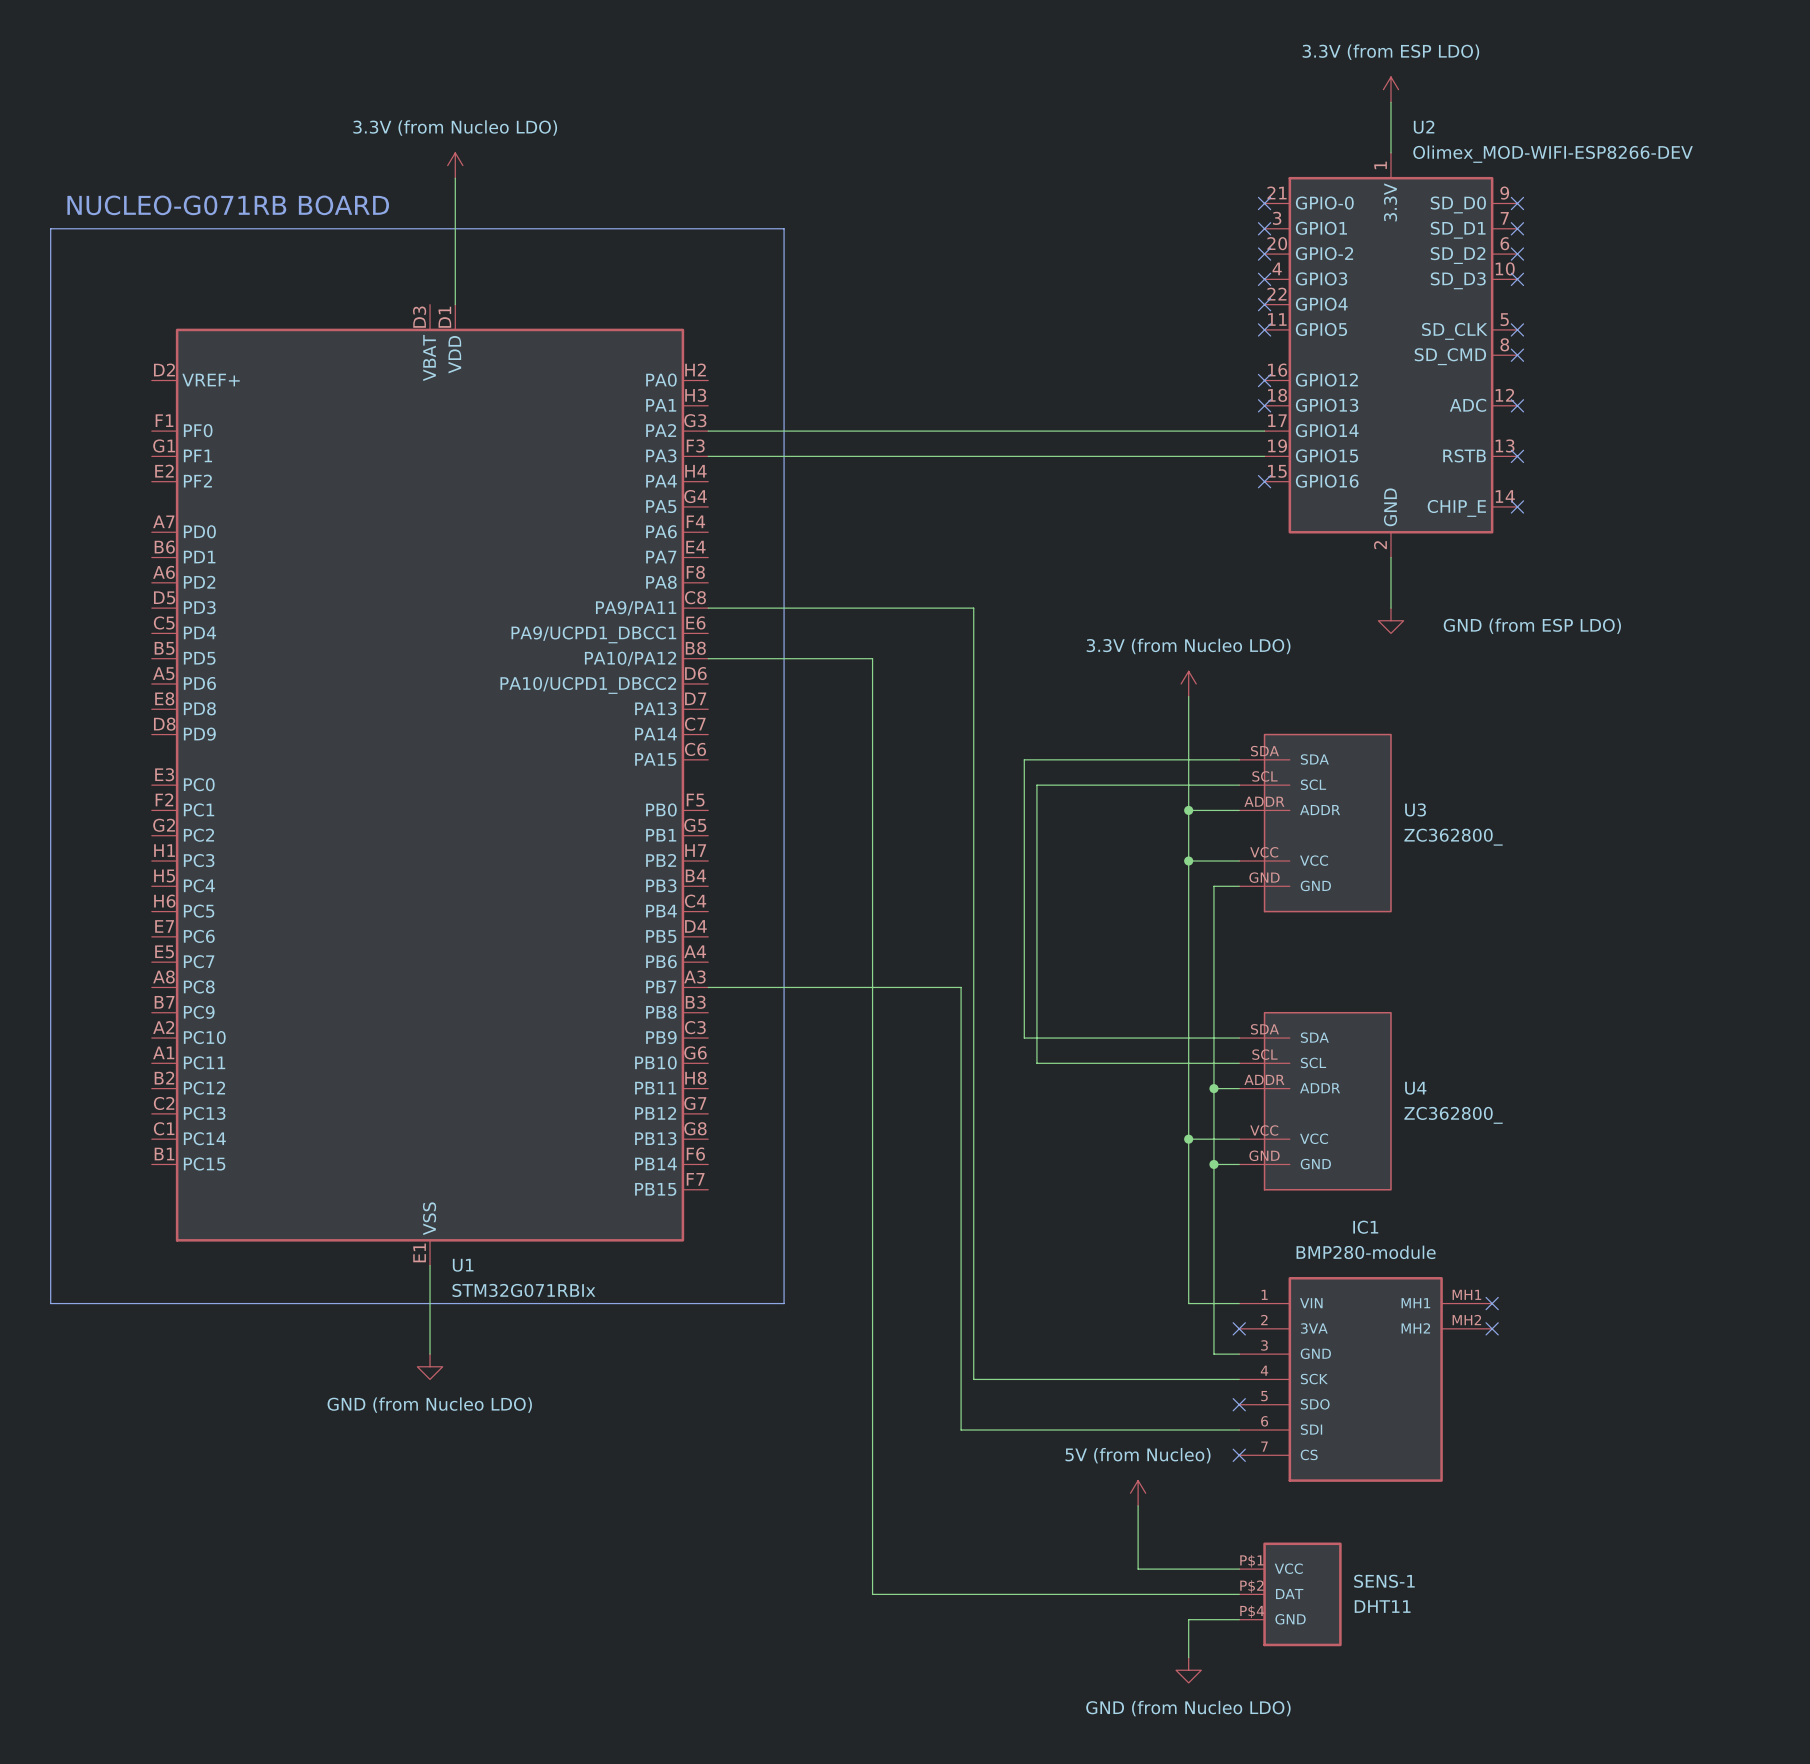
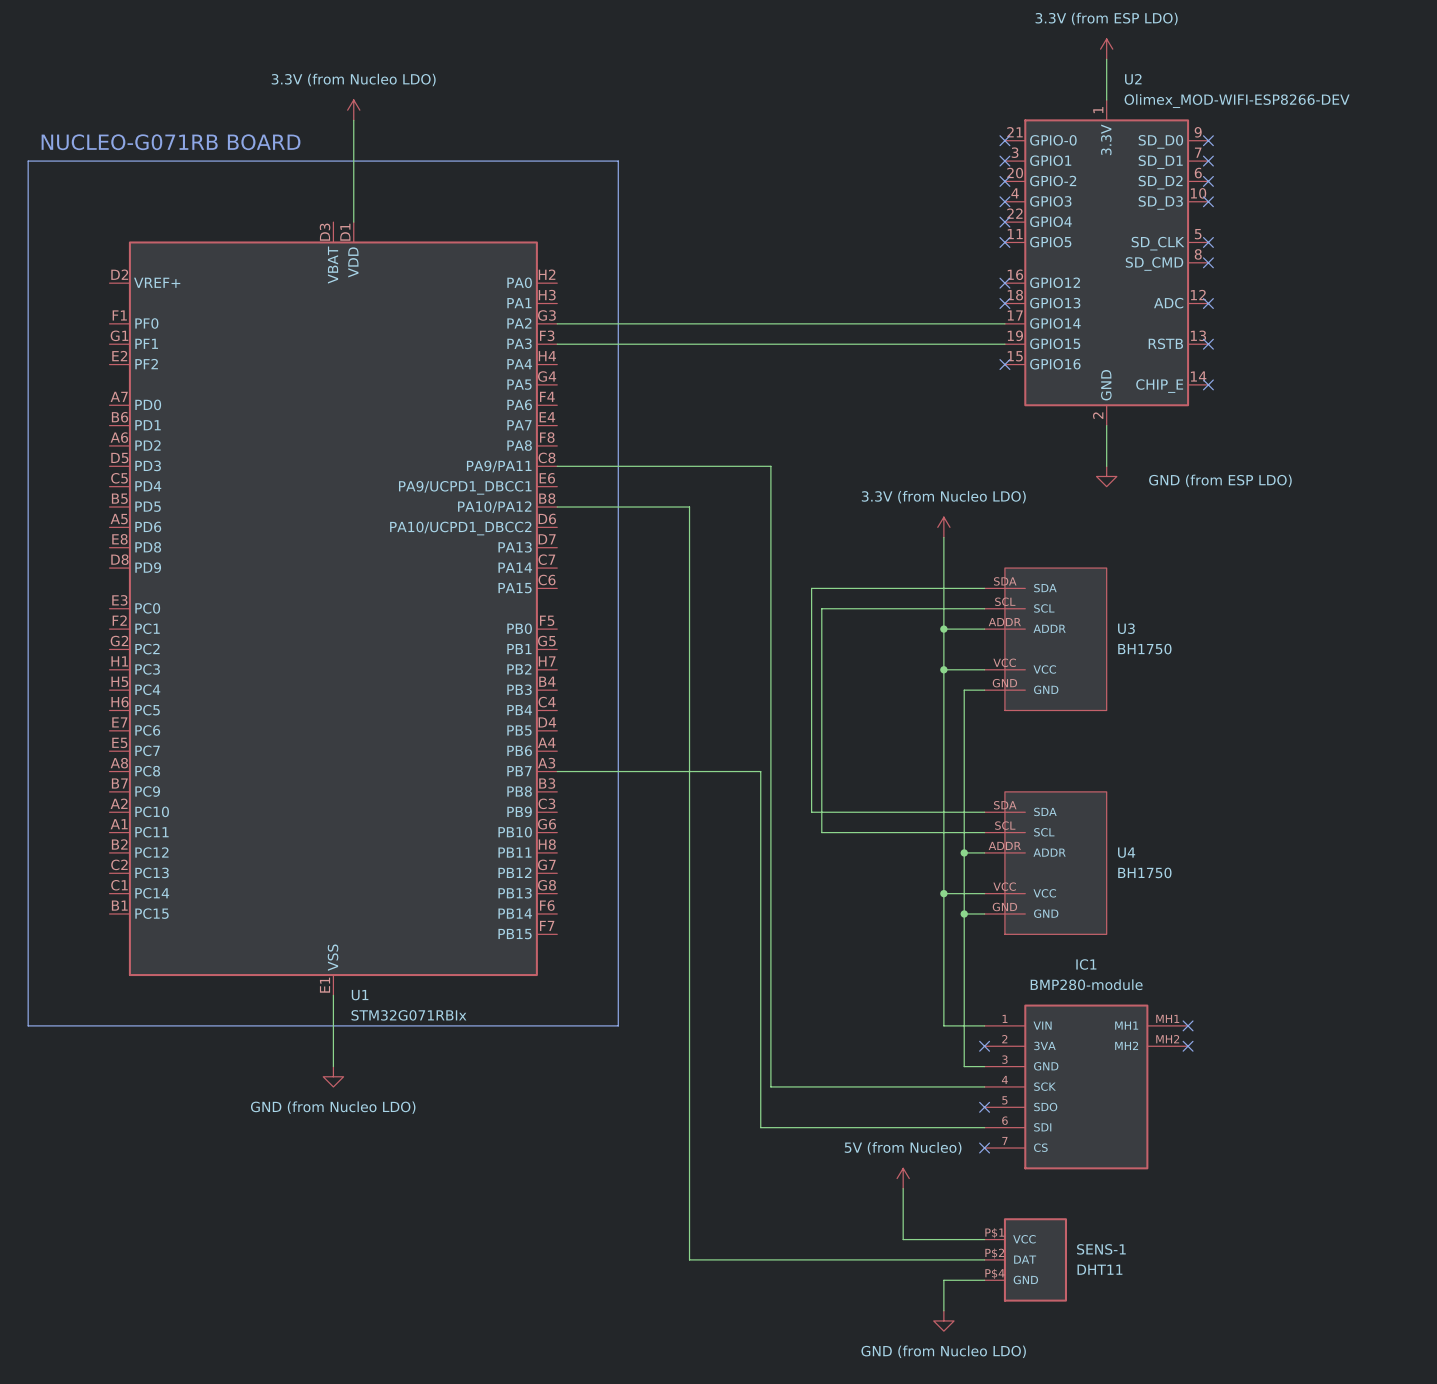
U3 value: ZC362800_ (1453, 837) -> BH1750 (1144, 649)
U4 value: ZC362800_ (1453, 1115) -> BH1750 (1144, 872)

